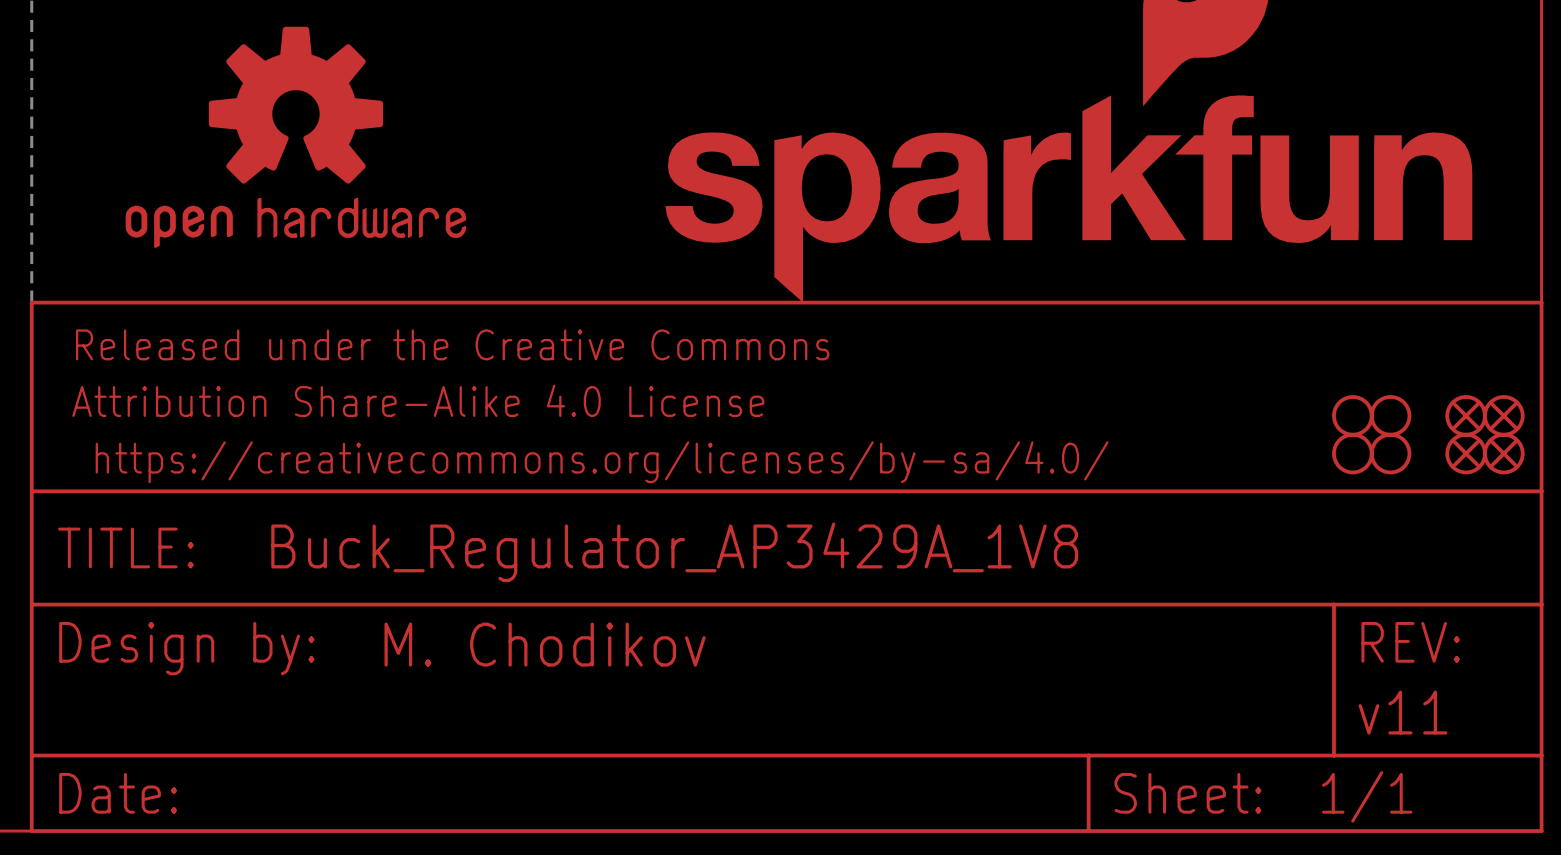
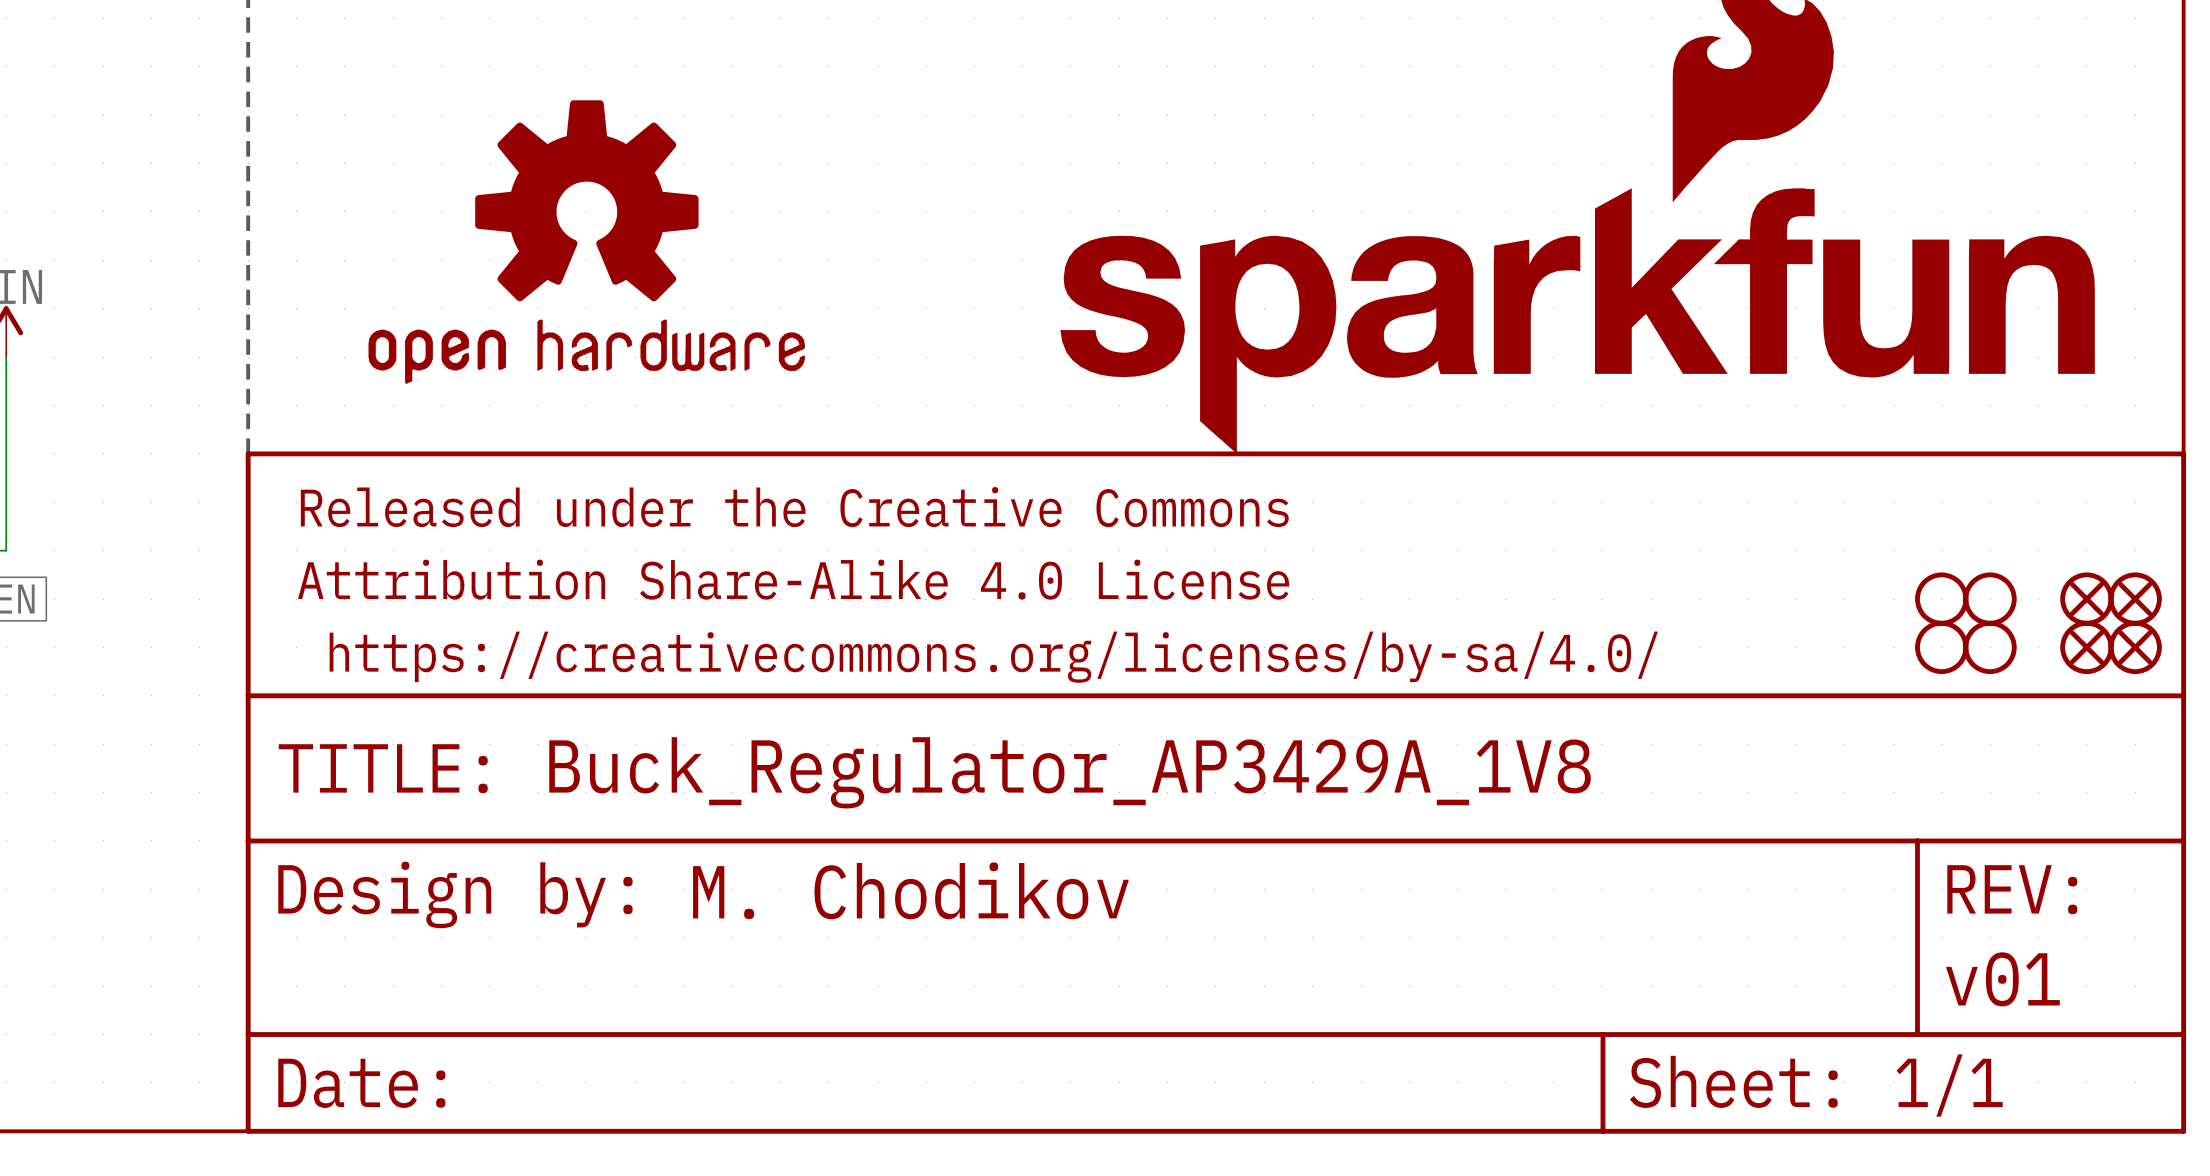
part text: v11 (1403, 712) -> v01 (2002, 979)

